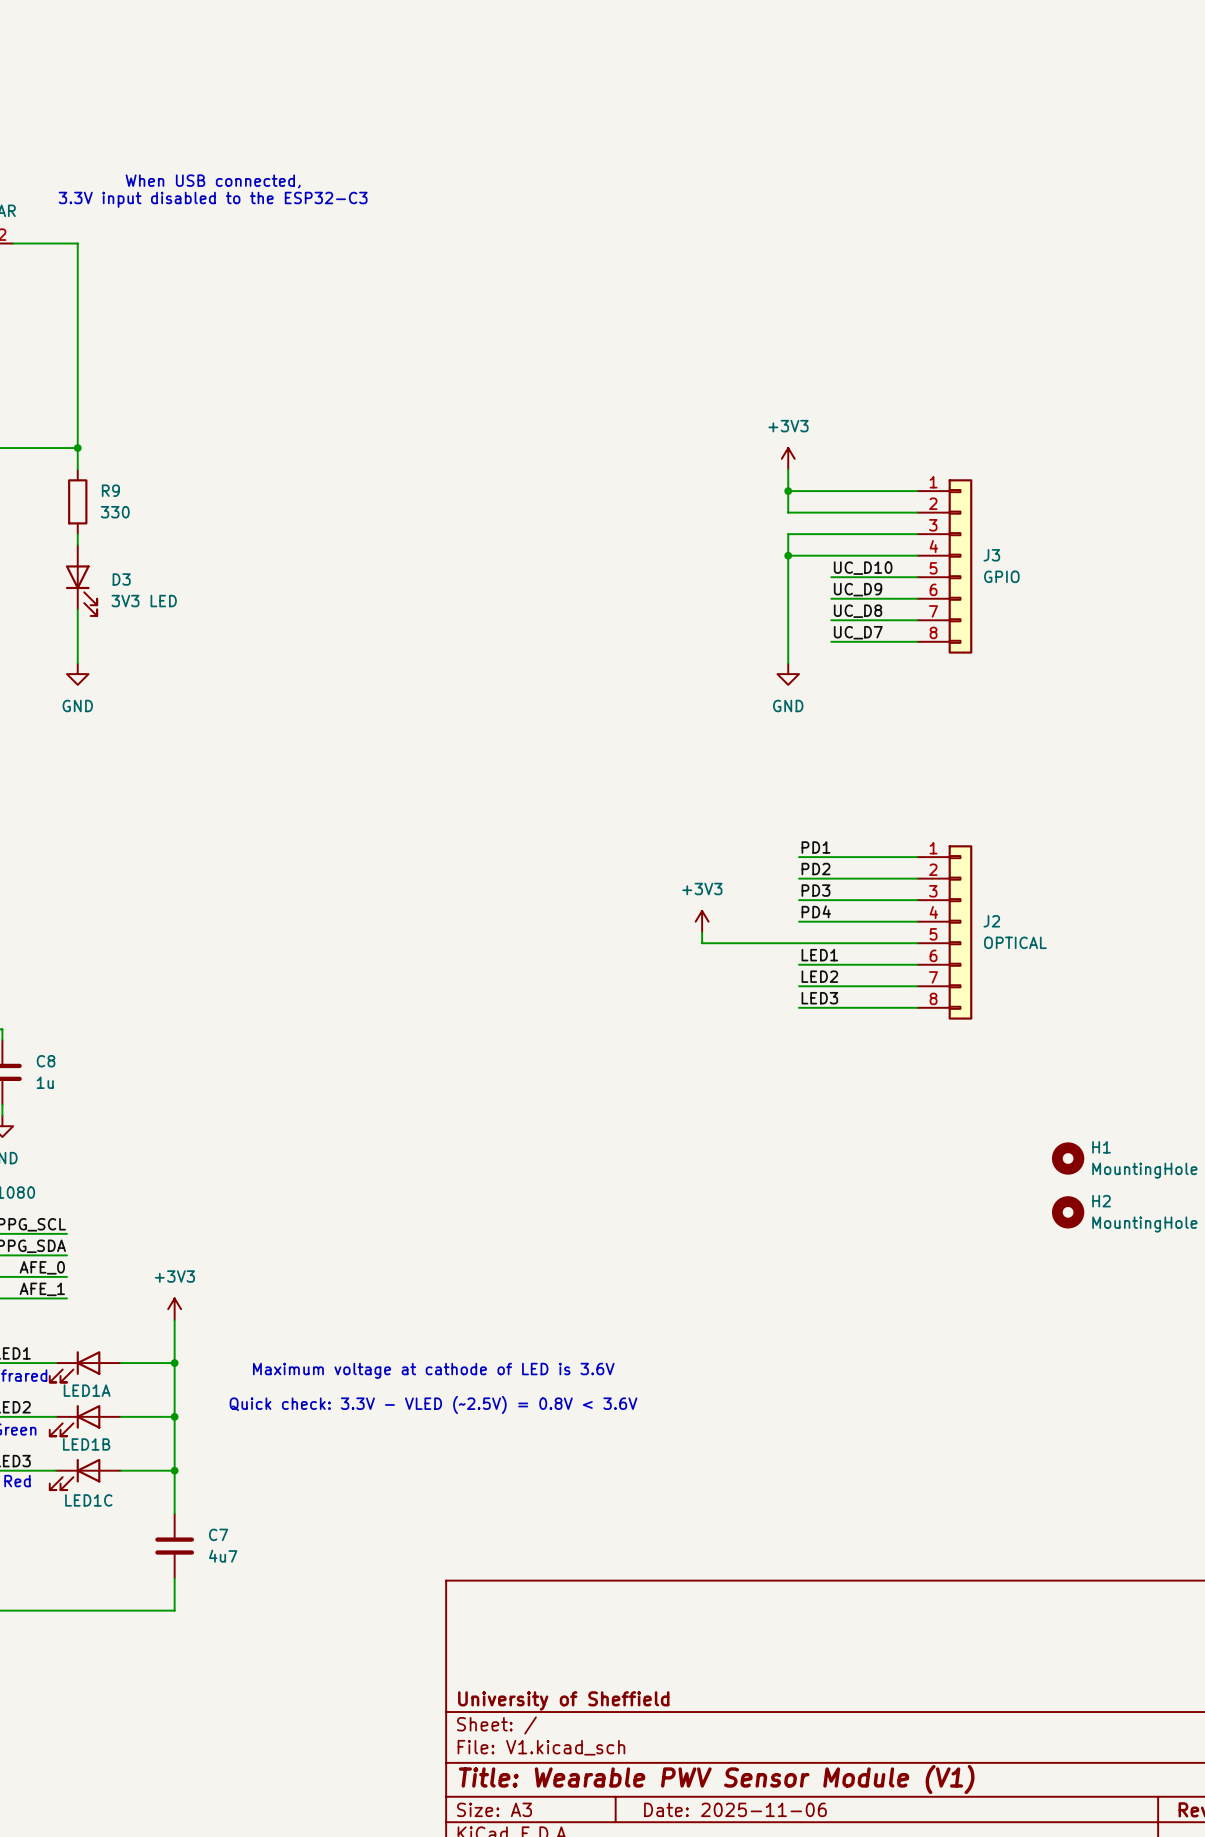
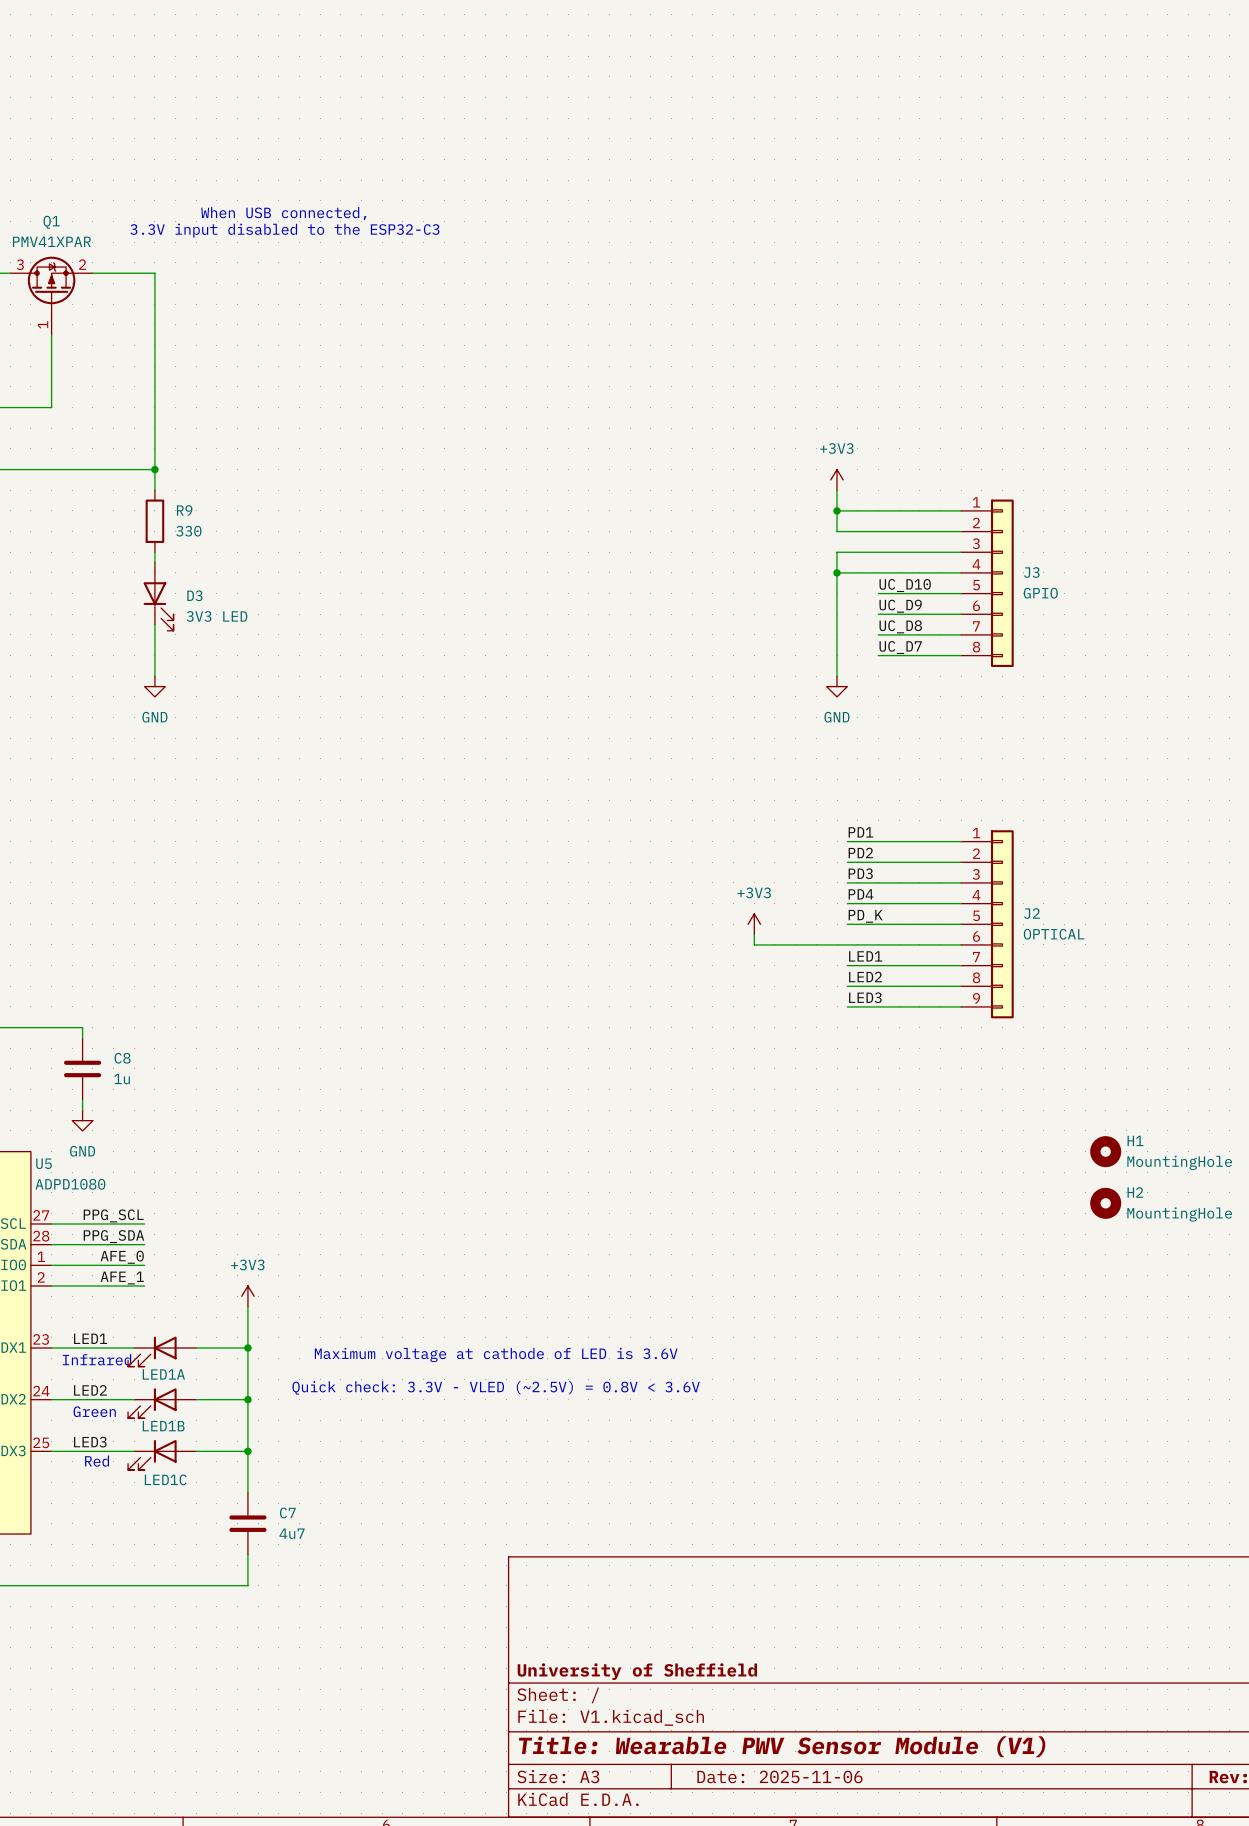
label: none -> PD1 (860, 832)
wire: none -> (847, 841) (961, 841)
J2 symbol: [917, 845, 973, 1020] -> [961, 830, 1014, 1019]
label: PD1 (815, 847) -> PD2 (860, 852)
label: PD2 (815, 869) -> PD3 (860, 873)
label: PD3 (815, 890) -> PD4 (861, 894)
label: PD4 (816, 911) -> PD_K (865, 916)

